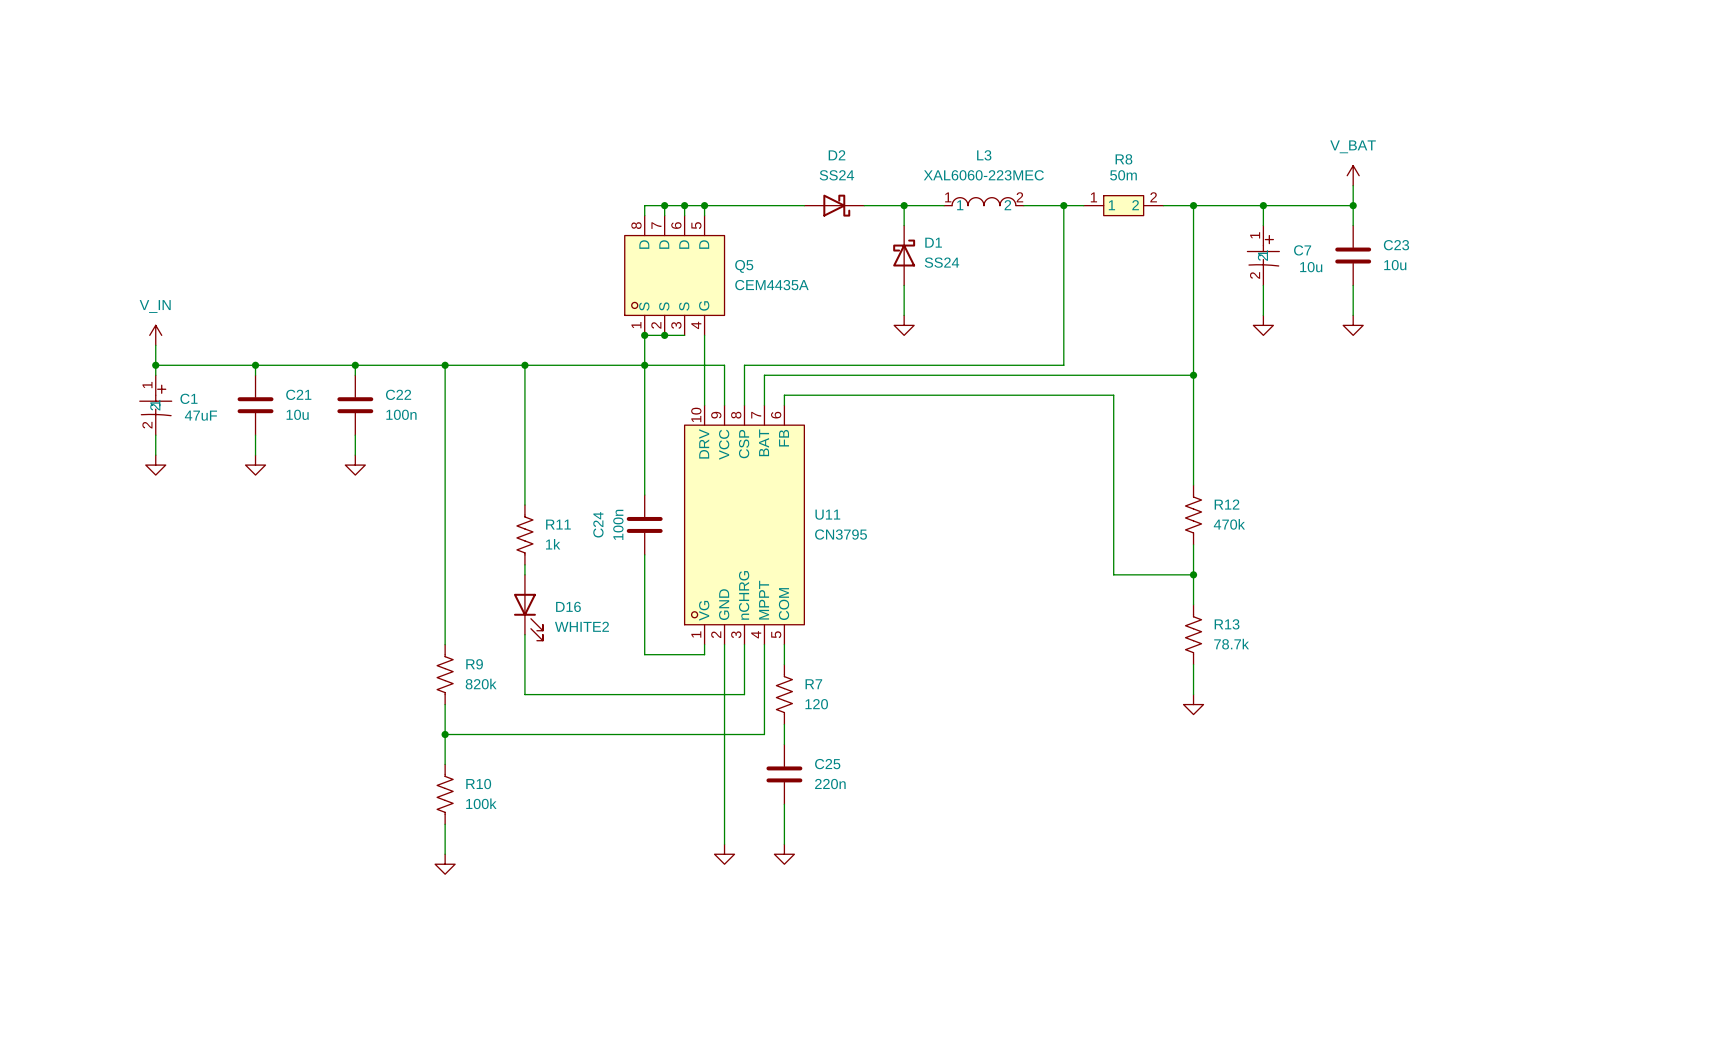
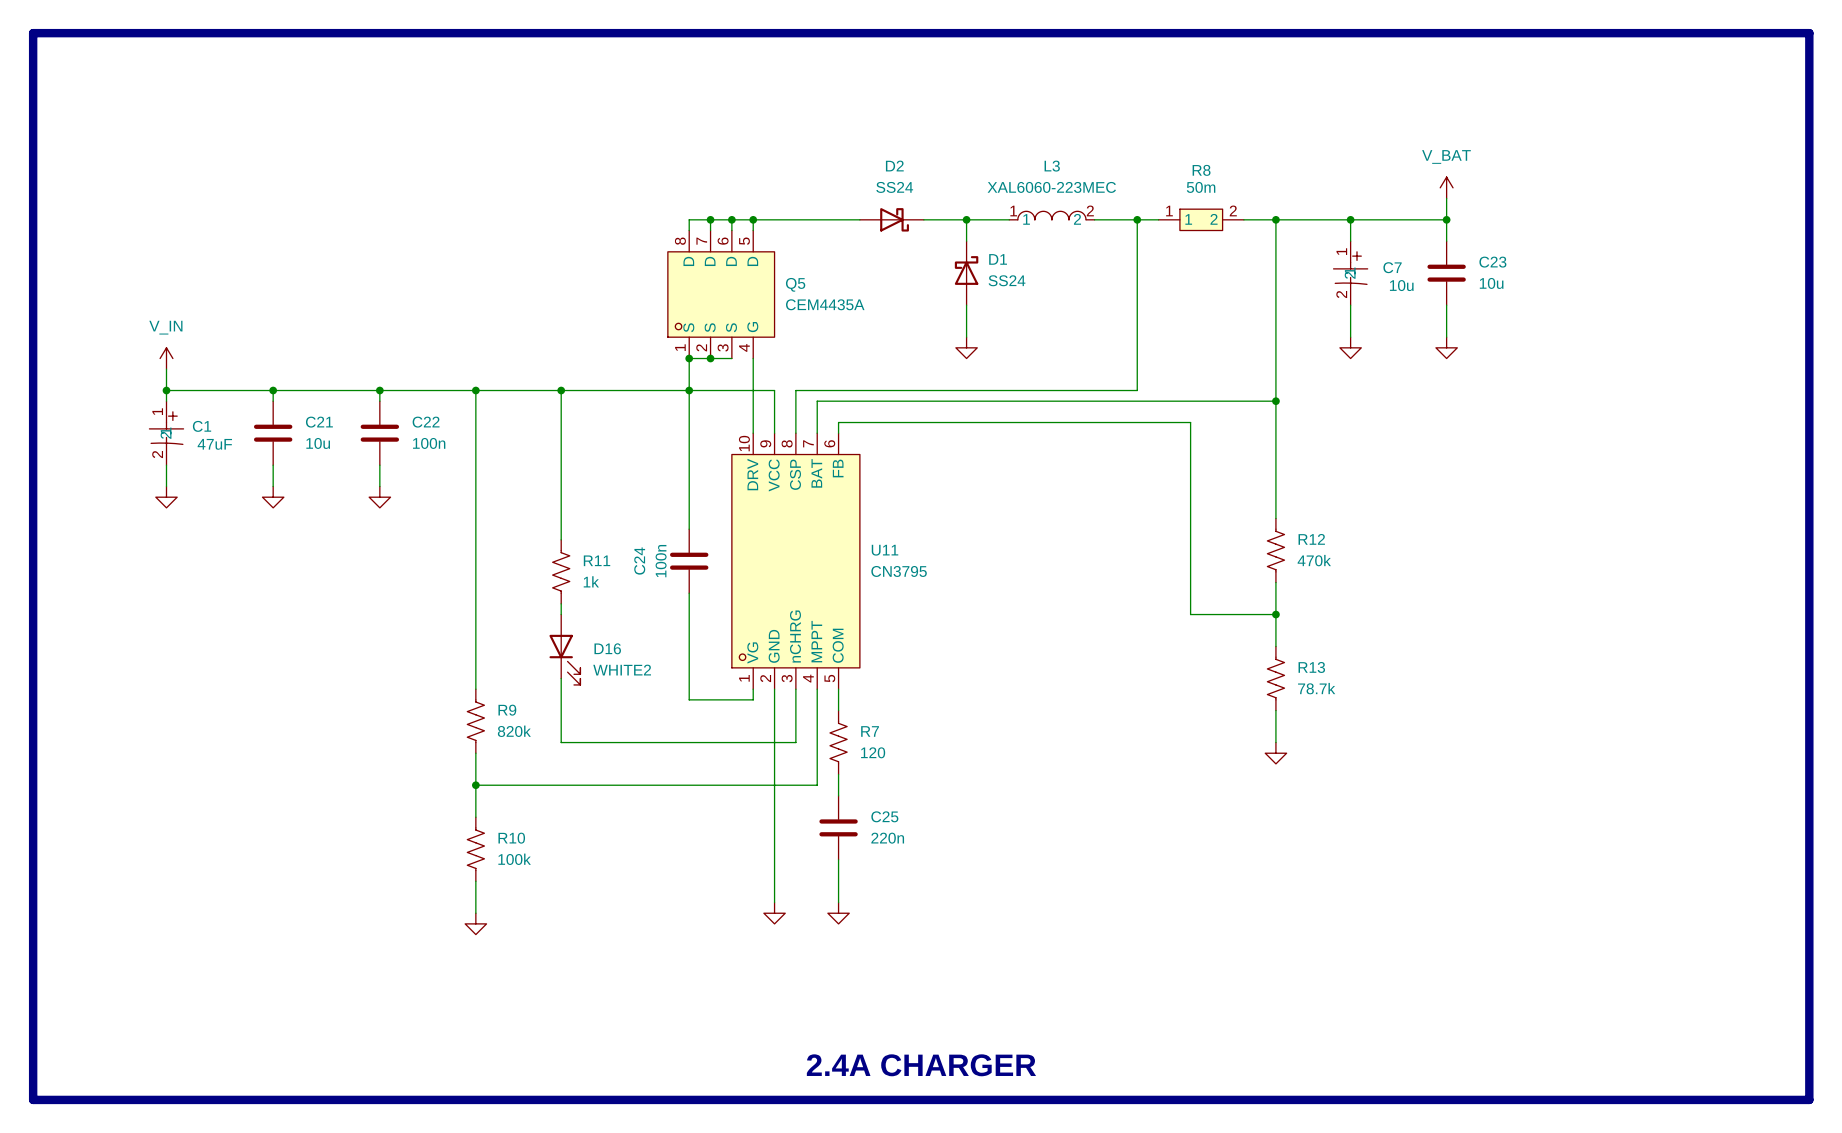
line: none -> (33, 33) (1809, 33) (1809, 1099) (33, 1099) (33, 33)
text: none -> 2.4A CHARGER (921, 1065)

